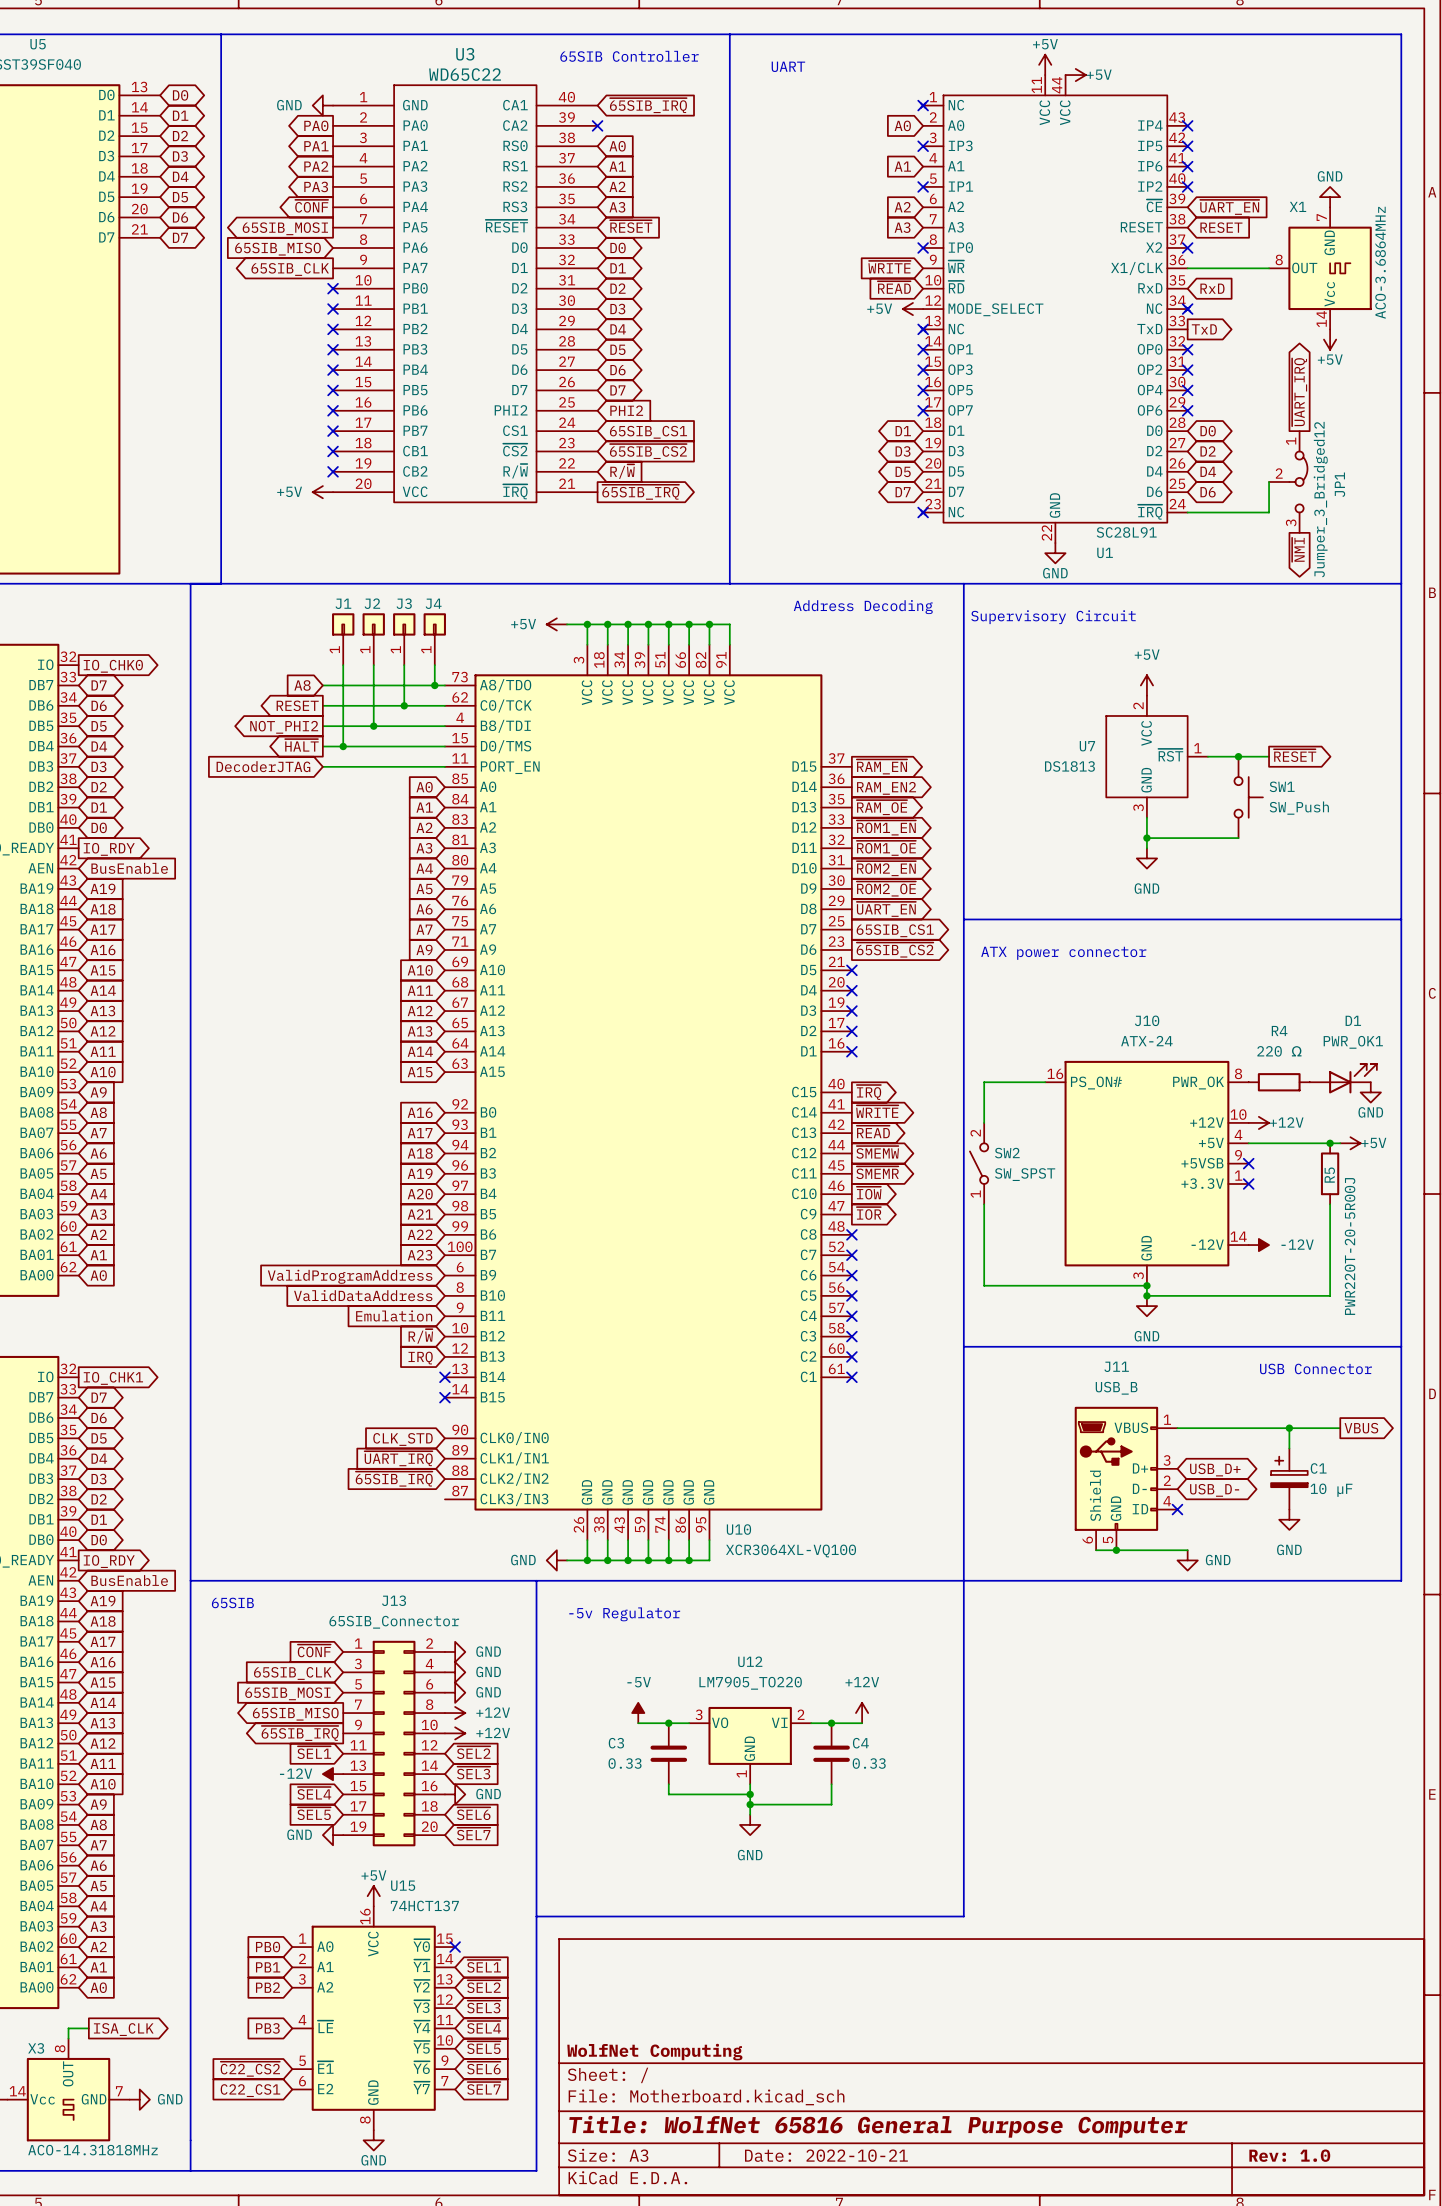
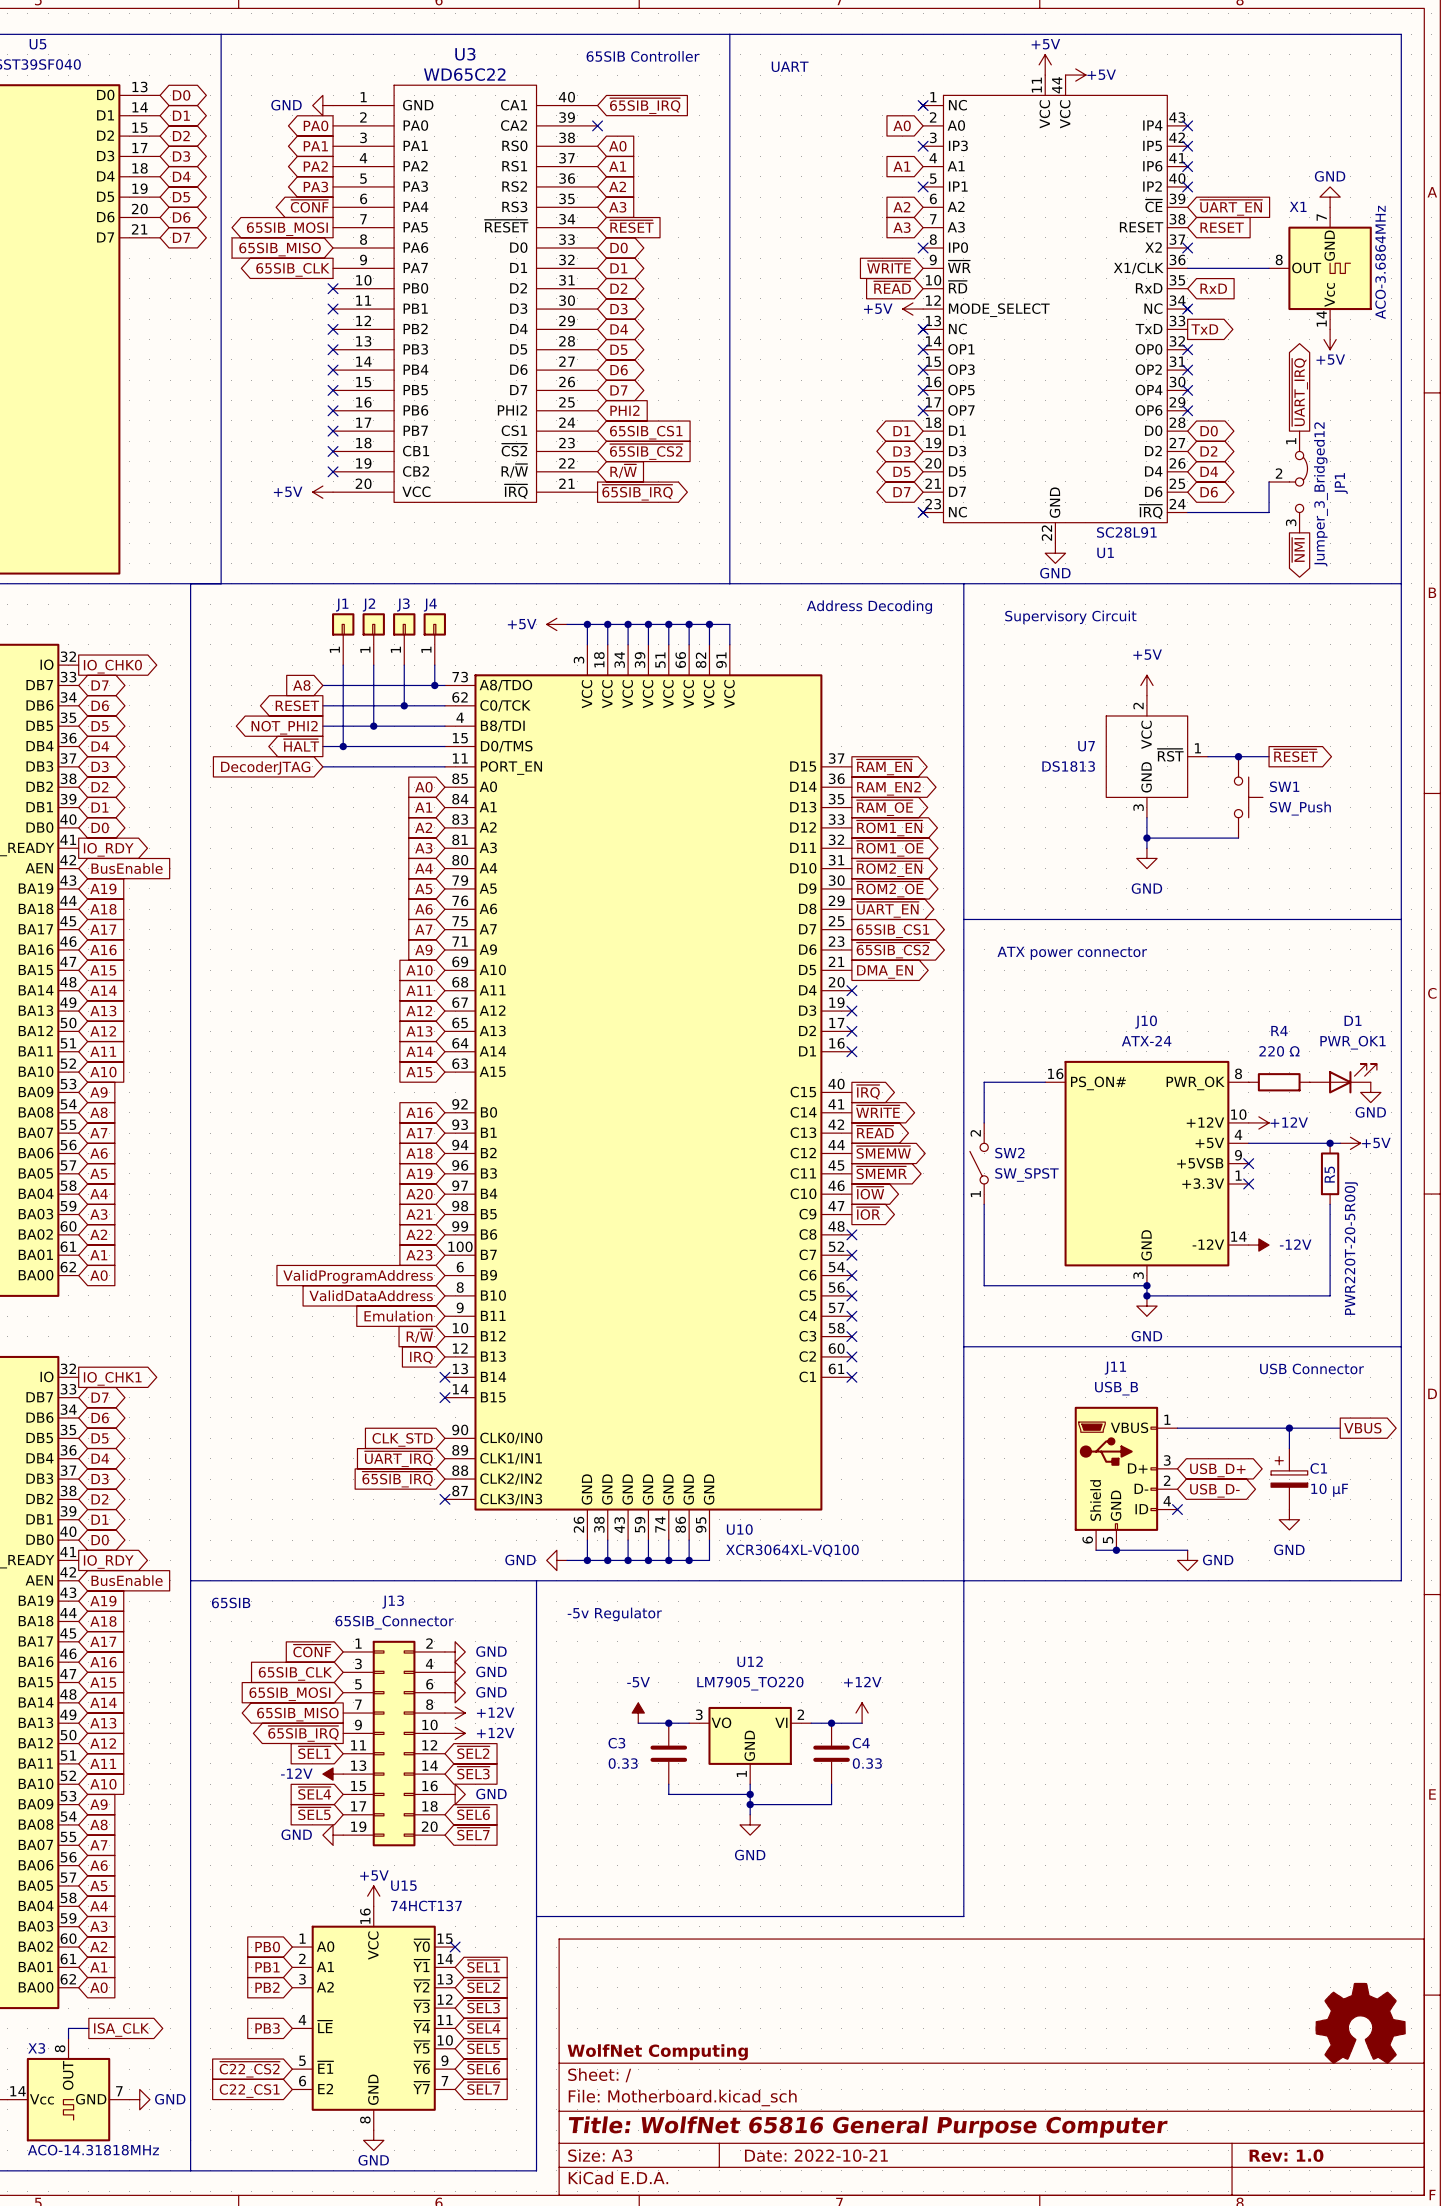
no-connect mark: (851, 970) -> none
global label: none -> DMA_EN (885, 971)
no-connect mark: none -> (444, 1499)
power symbol: none -> (1360, 2023)

